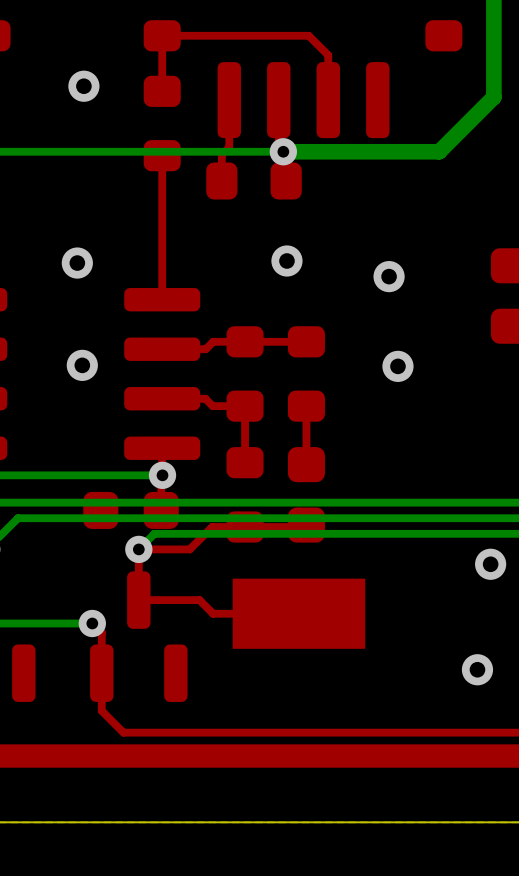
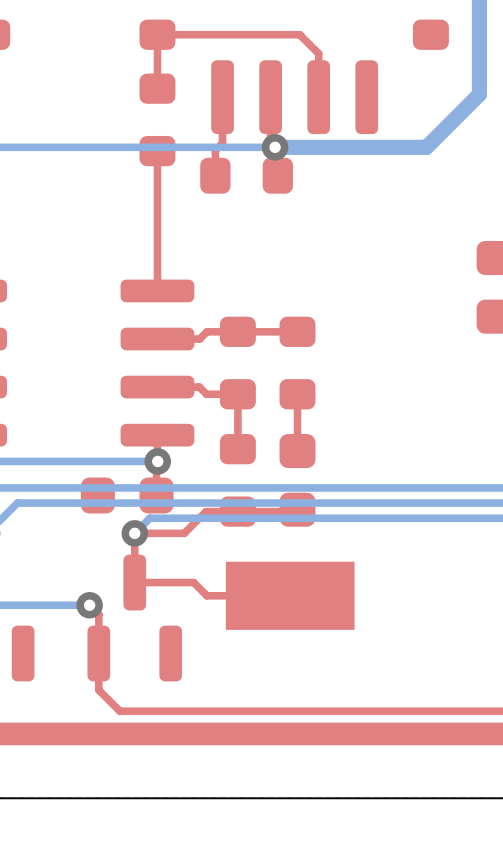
via: (83, 86) -> none
via: (286, 260) -> none
via: (77, 263) -> none
via: (389, 276) -> none
via: (82, 365) -> none
via: (397, 366) -> none
via: (490, 564) -> none
via: (477, 669) -> none

